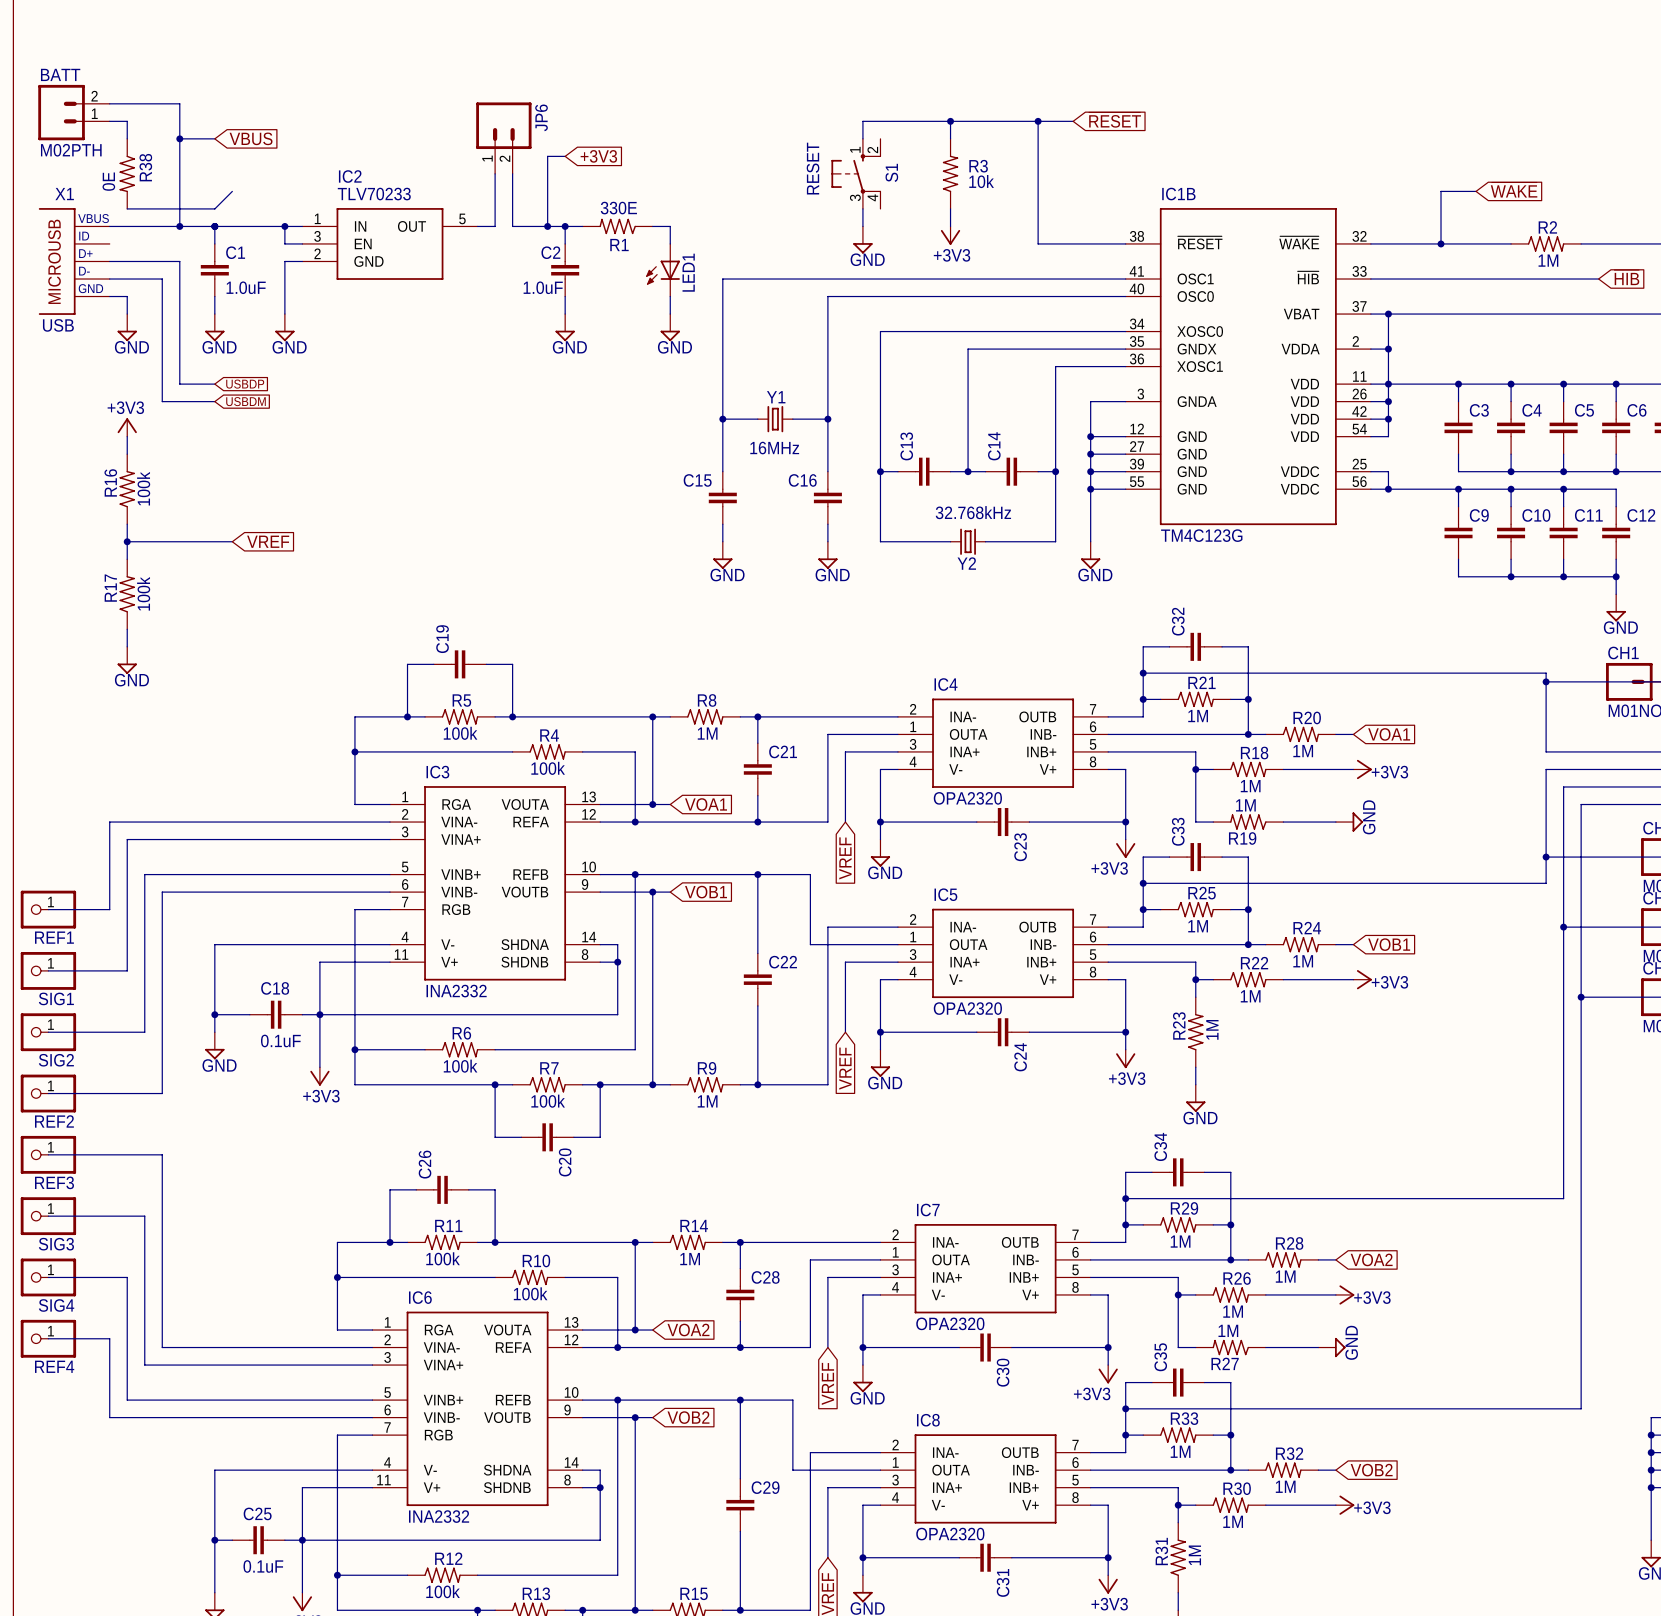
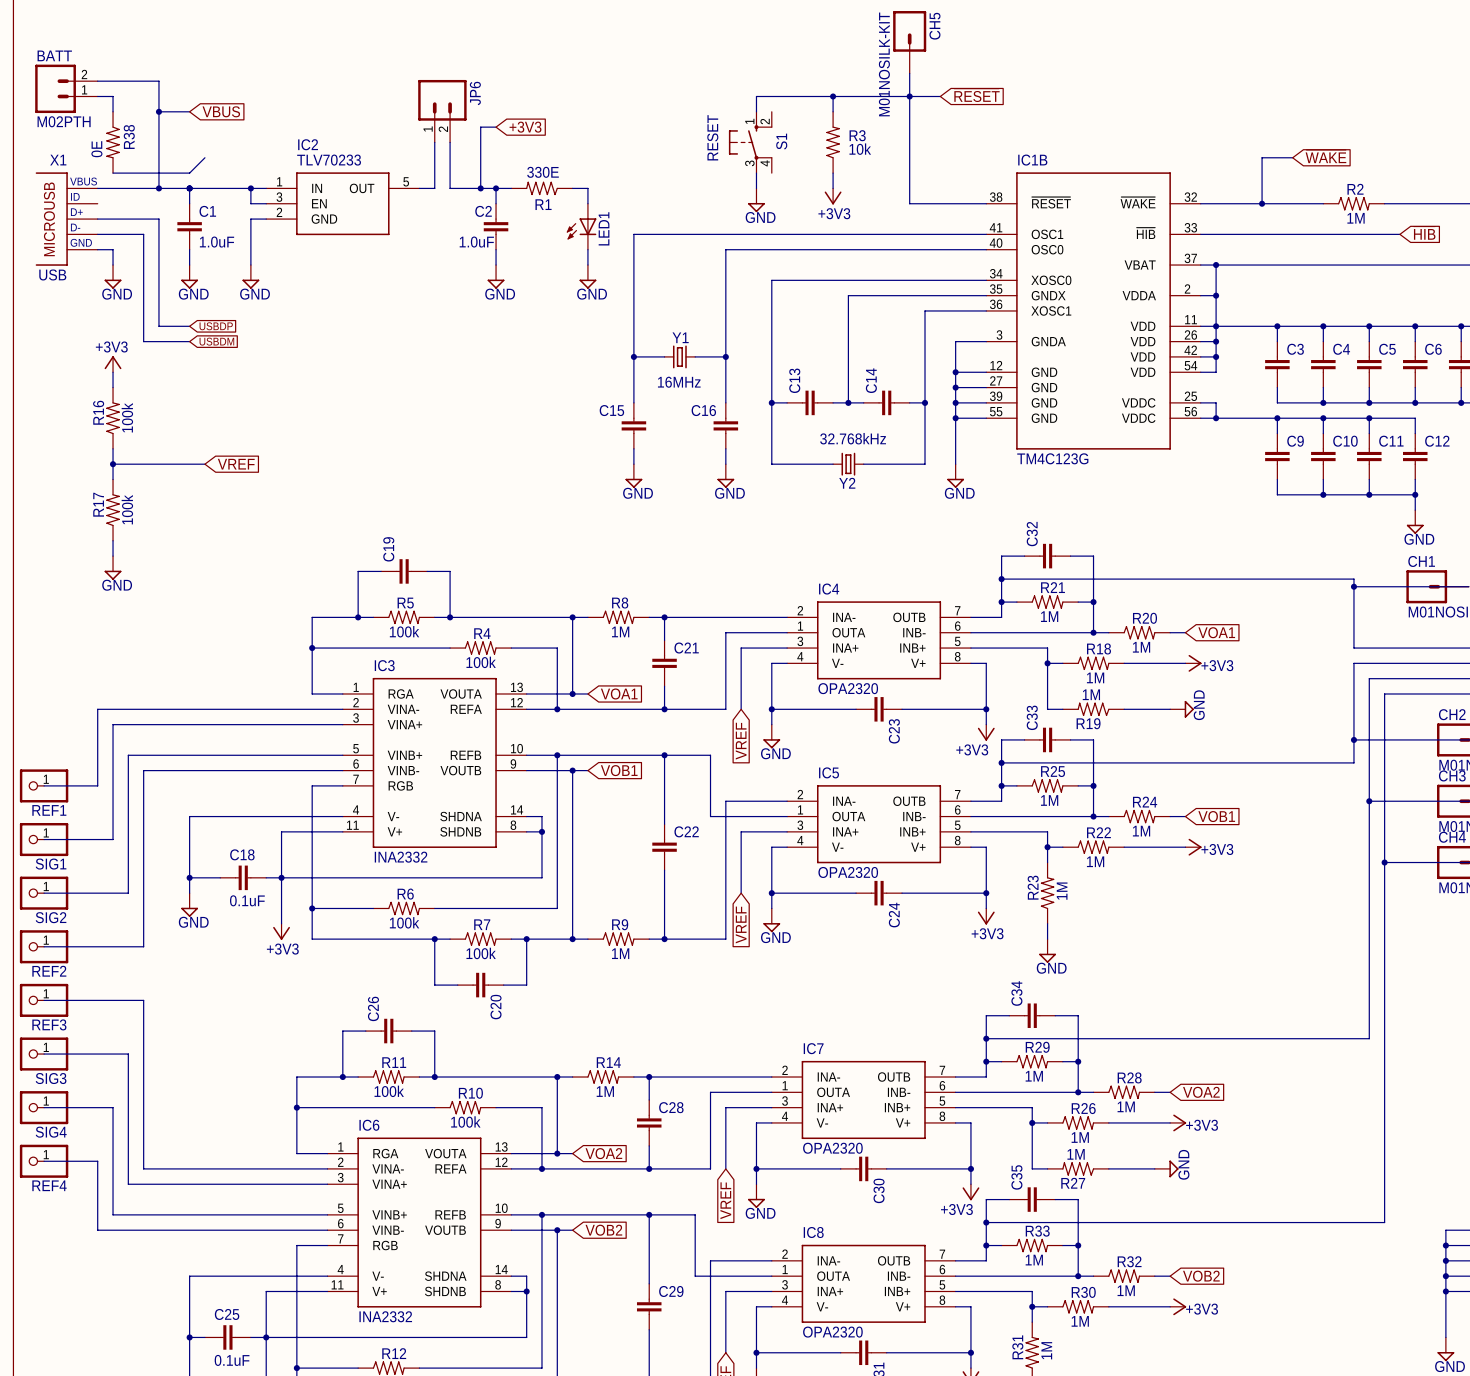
CH5: none -> M01NOSILK-KIT (909, 42)
wire: none -> (909, 73) (909, 96)

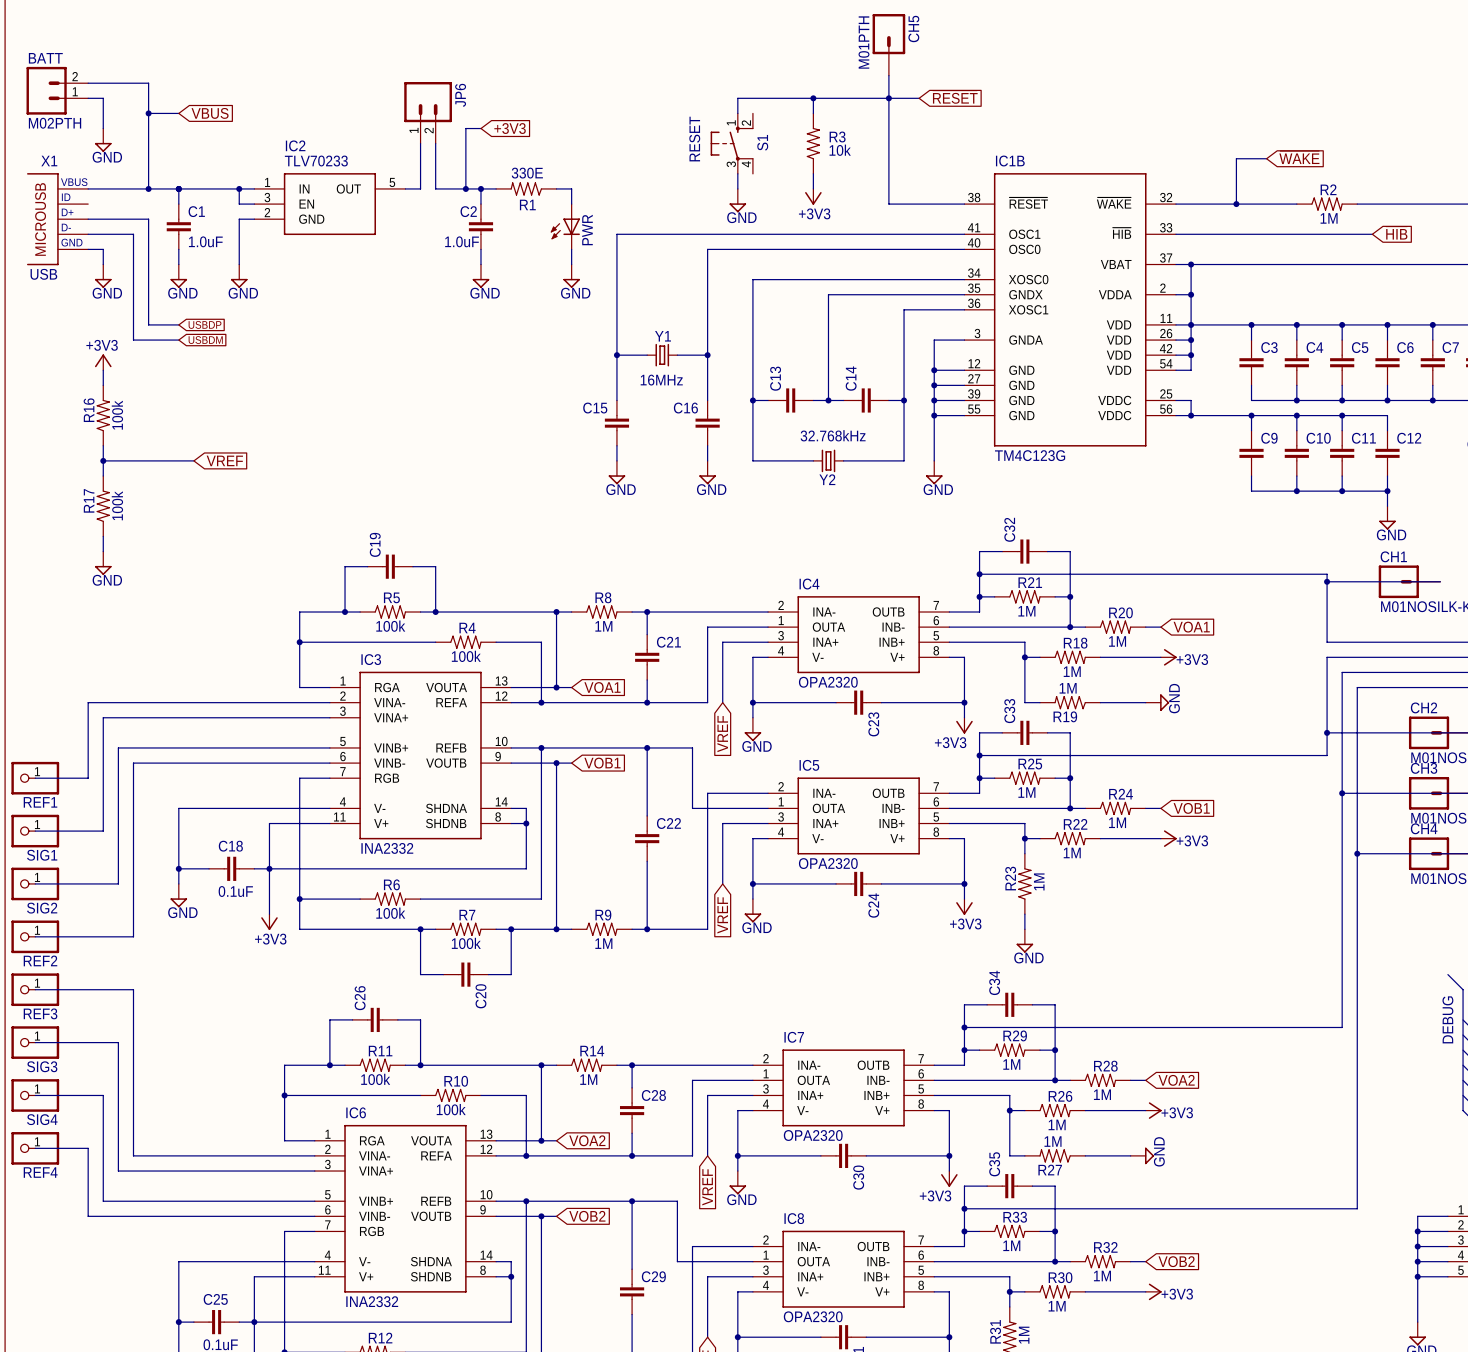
CH5 value: M01NOSILK-KIT (884, 64) -> M01PTH (863, 42)
power symbol: none -> GND (103, 140)
R38: 0E (113, 142) -> none
wire: (204, 157) (189, 173) (113, 173) -> none
LED1 name: LED1 (604, 228) -> PWR (587, 229)

